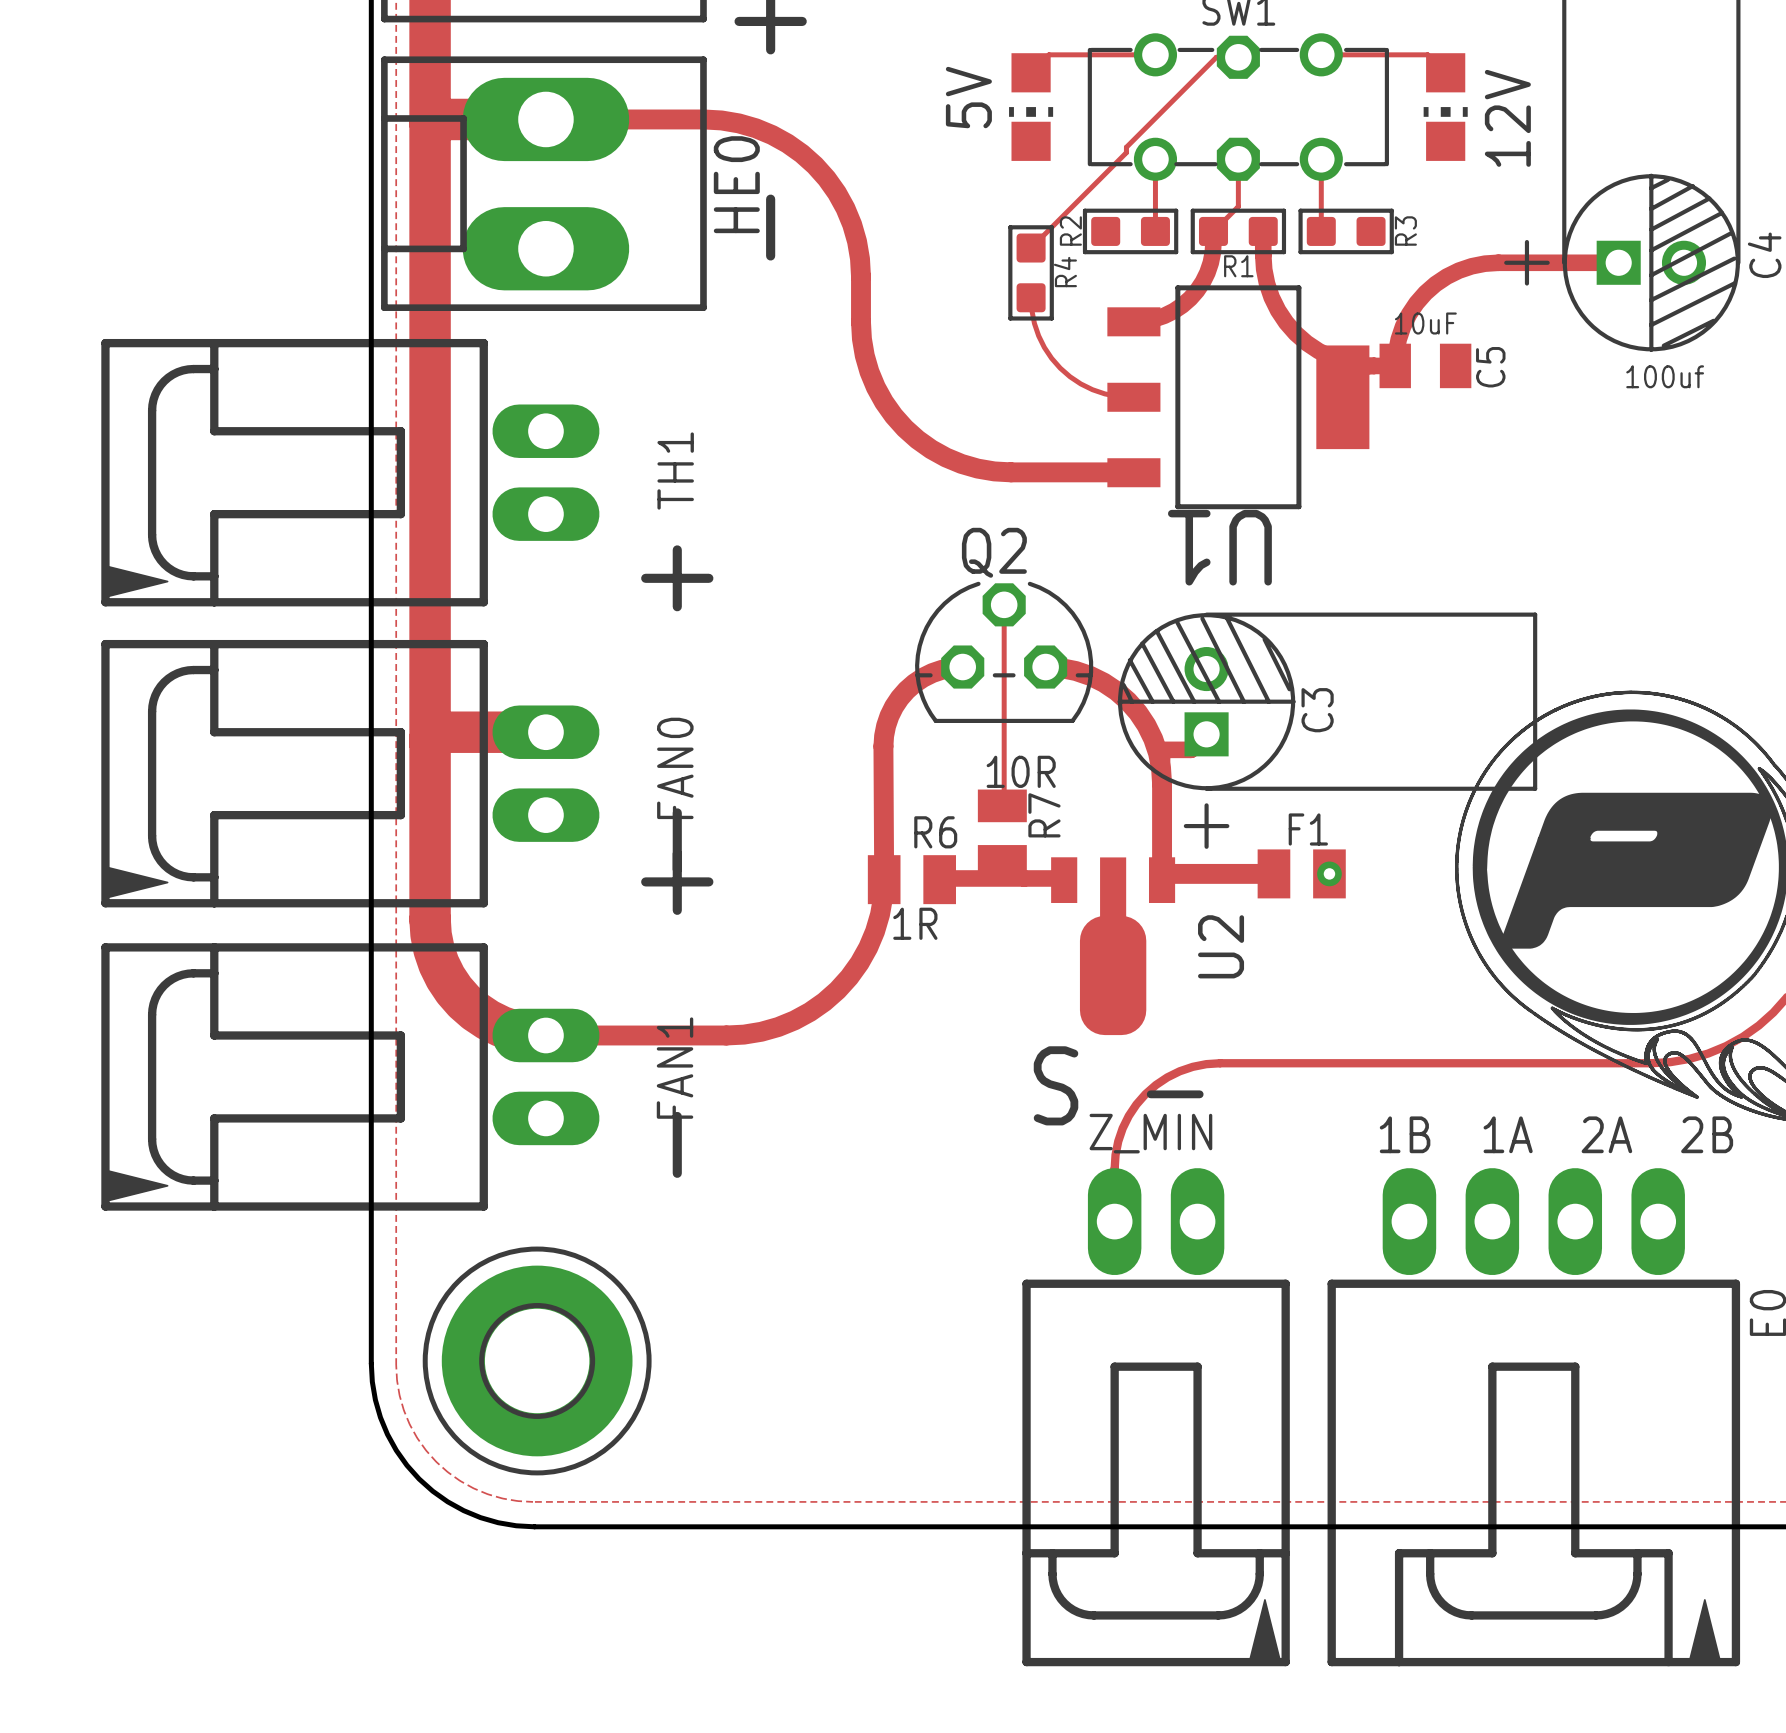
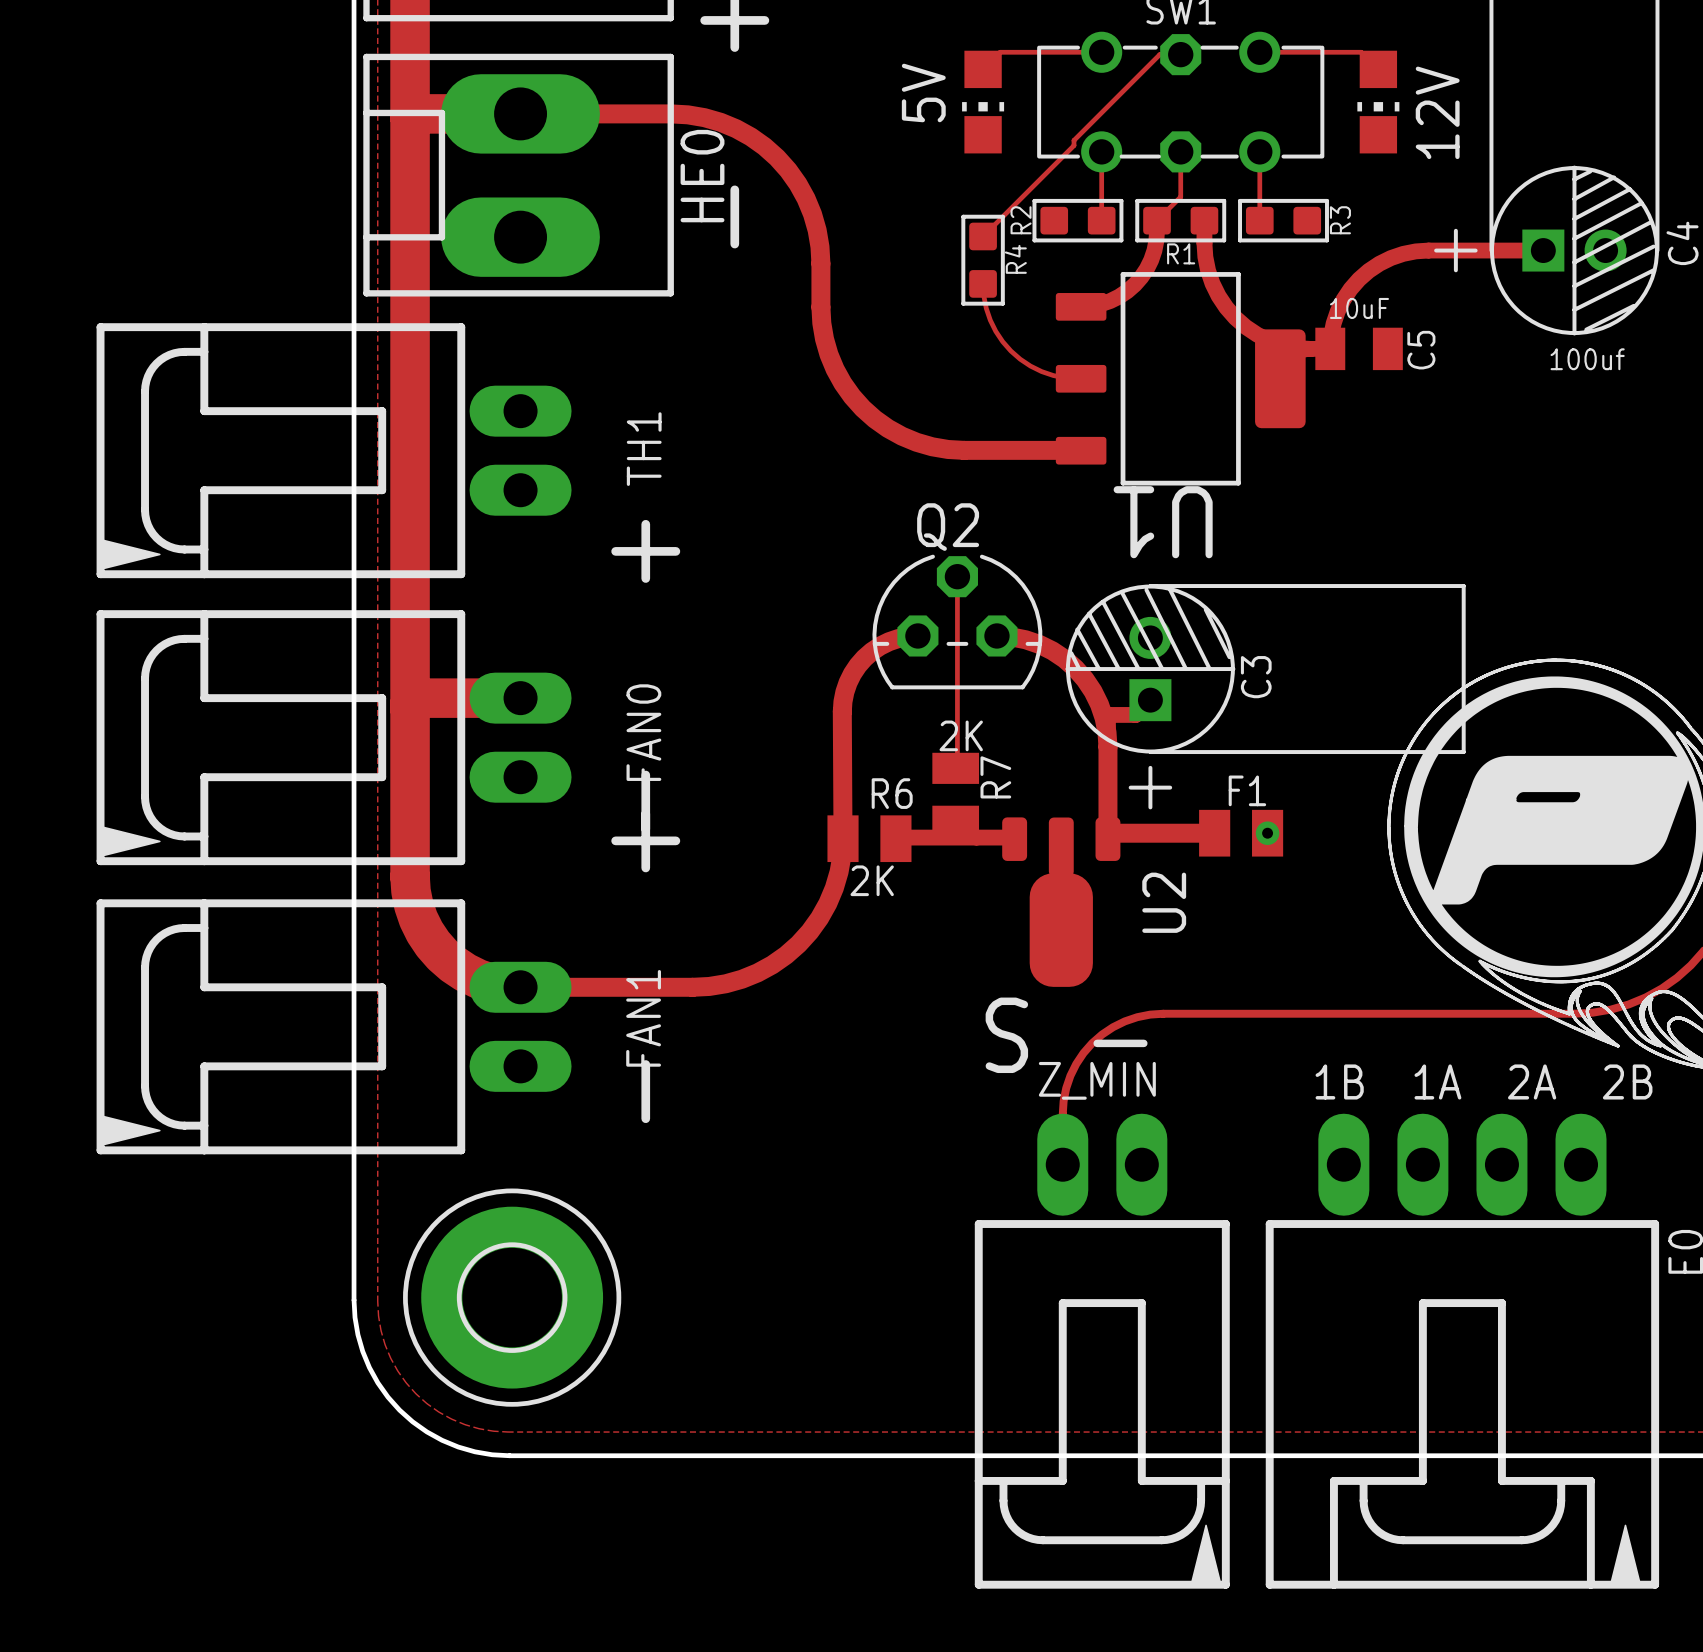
U1 footprint: [1107, 285, 1370, 510] -> [1055, 272, 1306, 486]
R7 value: 10R (1021, 771) -> 2K (961, 735)
U2 footprint: [1051, 857, 1176, 1036] -> [1002, 817, 1121, 987]
R6 value: 1R (915, 923) -> 2K (872, 880)

